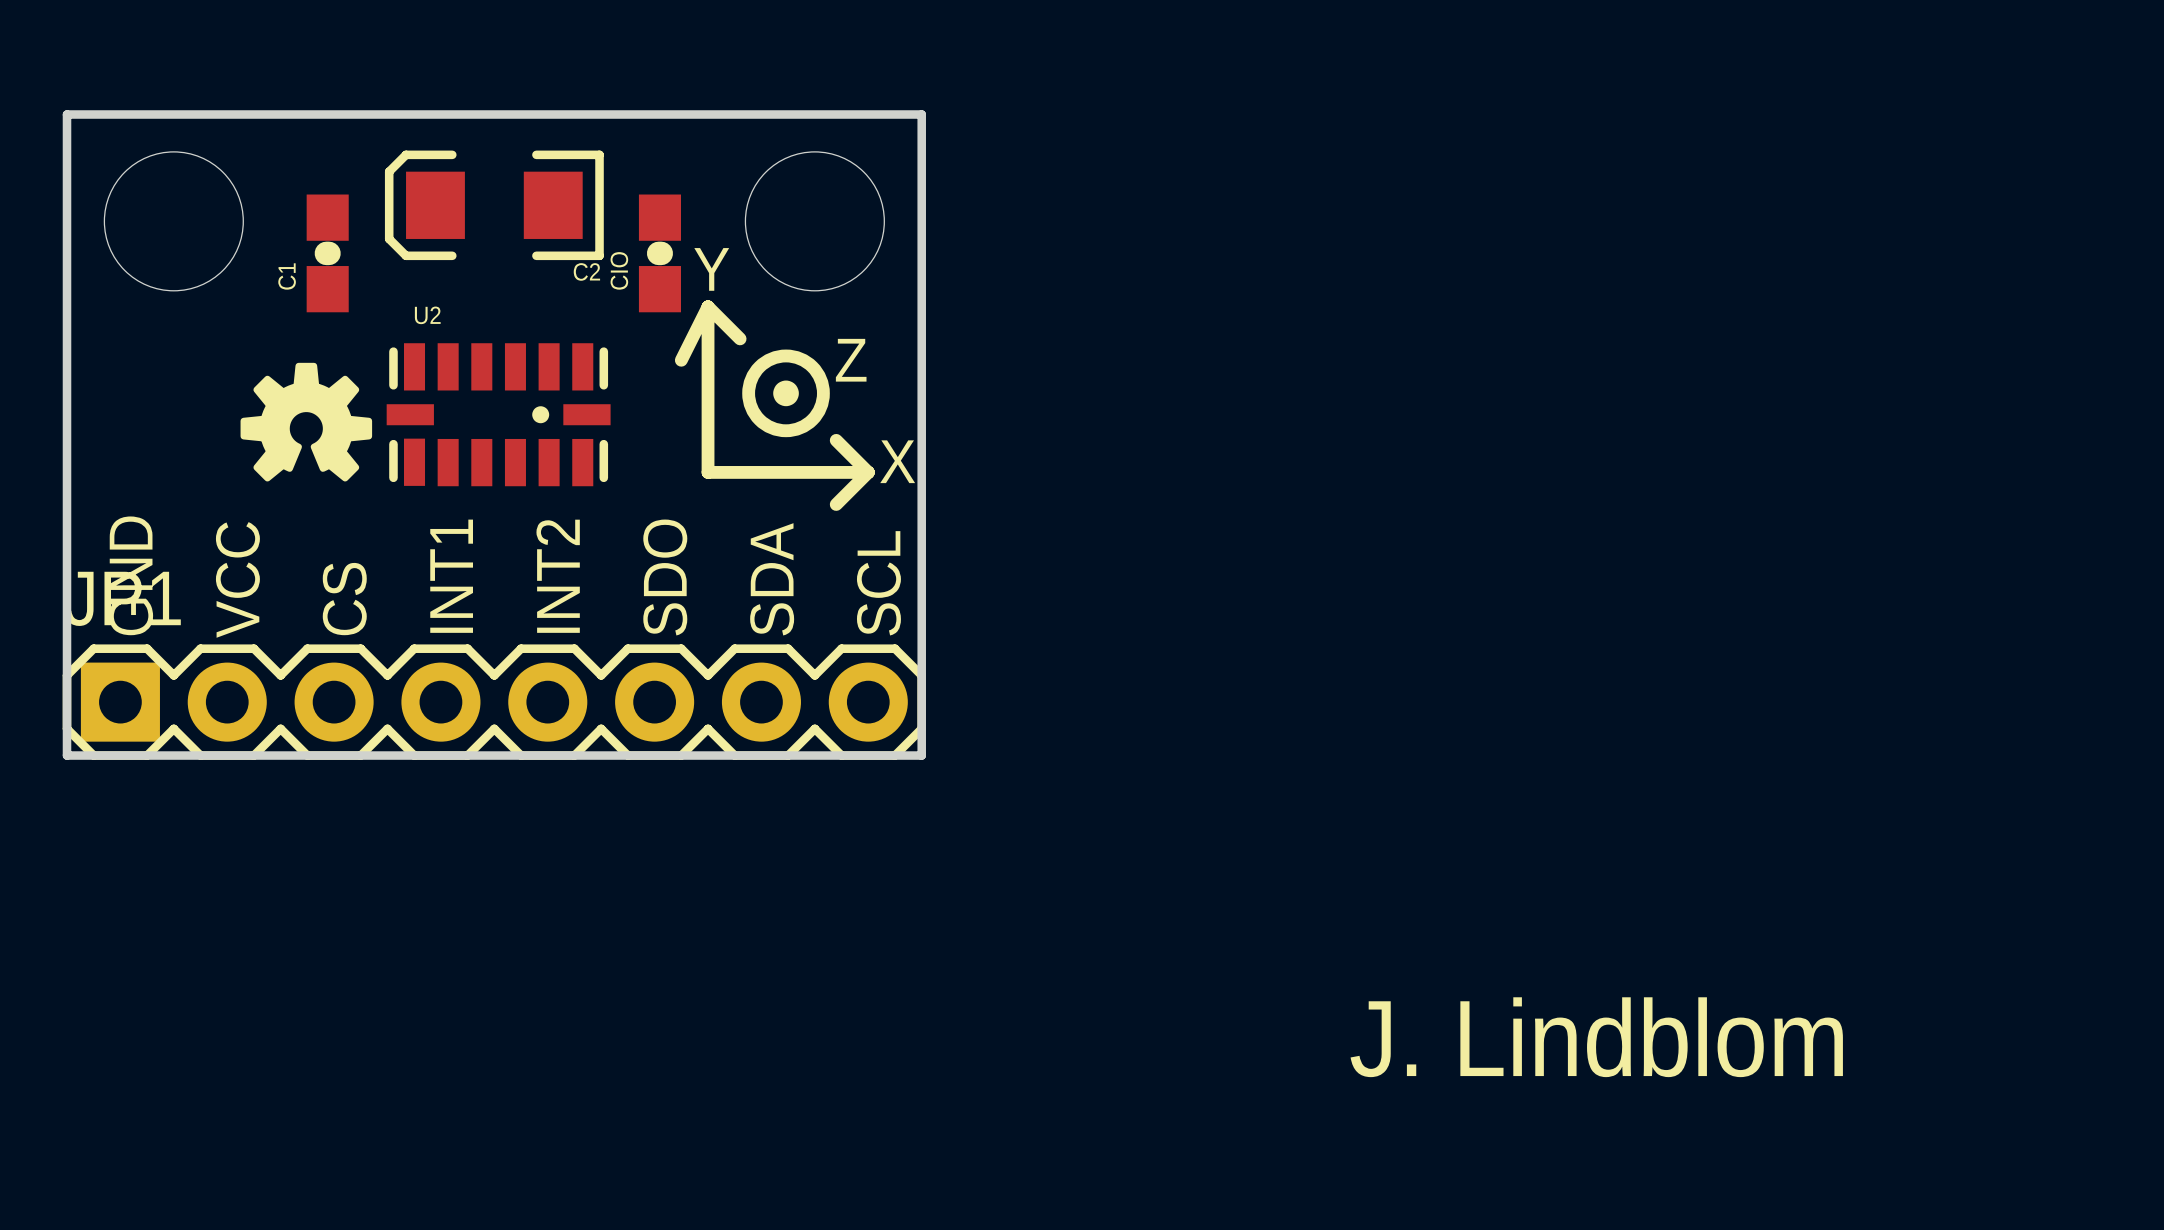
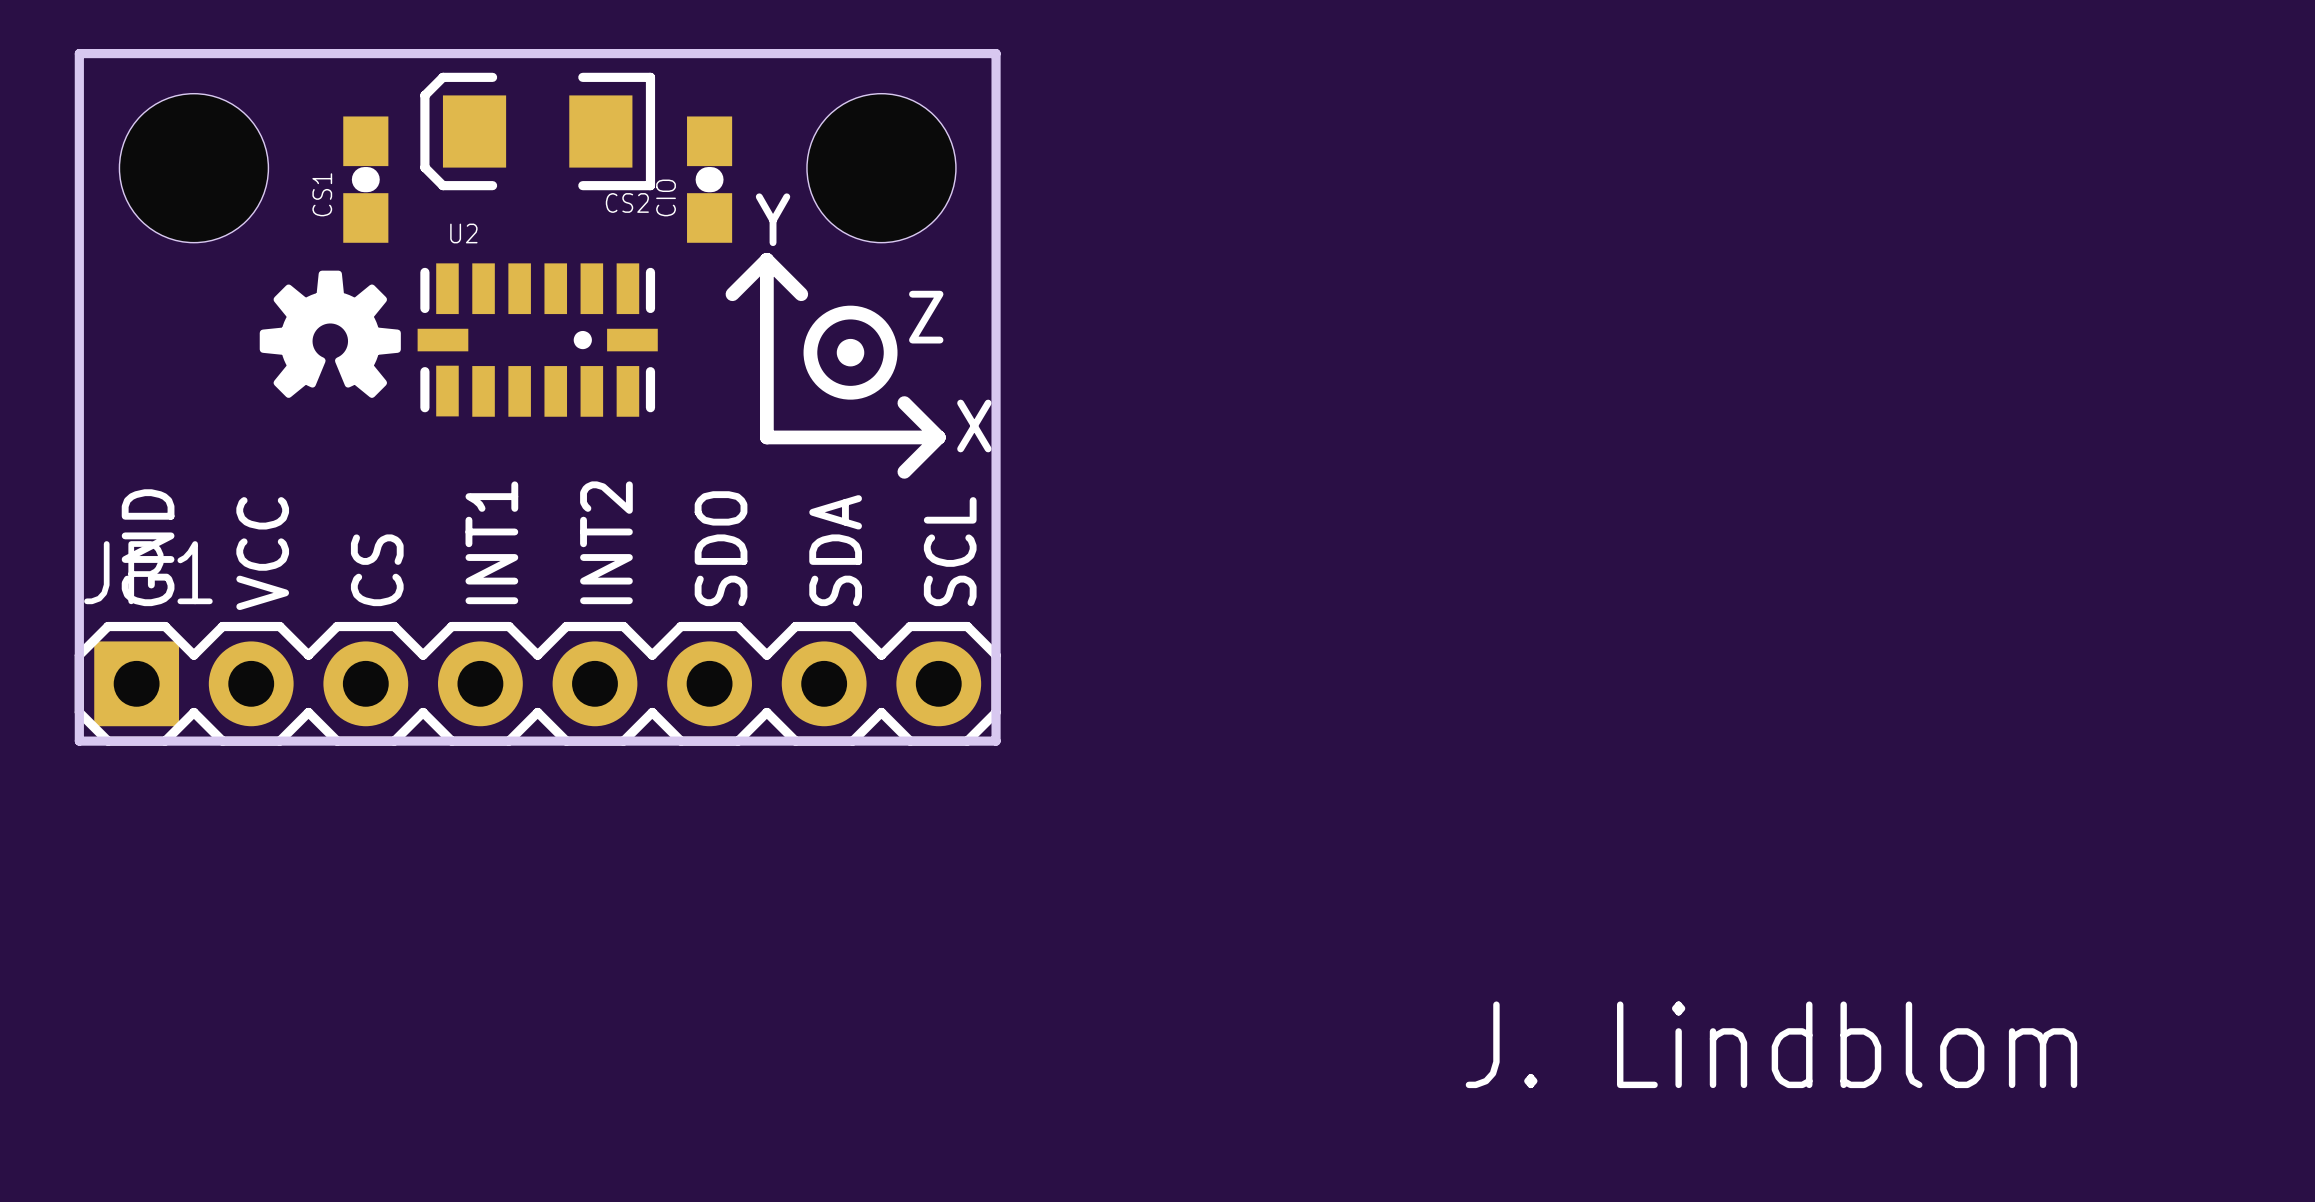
C2 position: (494, 205) -> (537, 131)
C1 position: (327, 253) -> (365, 179)
CIO position: (659, 253) -> (709, 179)
C2 name: C2 (586, 271) -> CS2 (627, 202)
C1 name: C1 (287, 276) -> CS1 (322, 194)
line: (708, 306) (681, 360) -> (766, 259) (732, 294)
U2 position: (498, 414) -> (537, 340)
drawing position: (306, 422) -> (330, 334)

